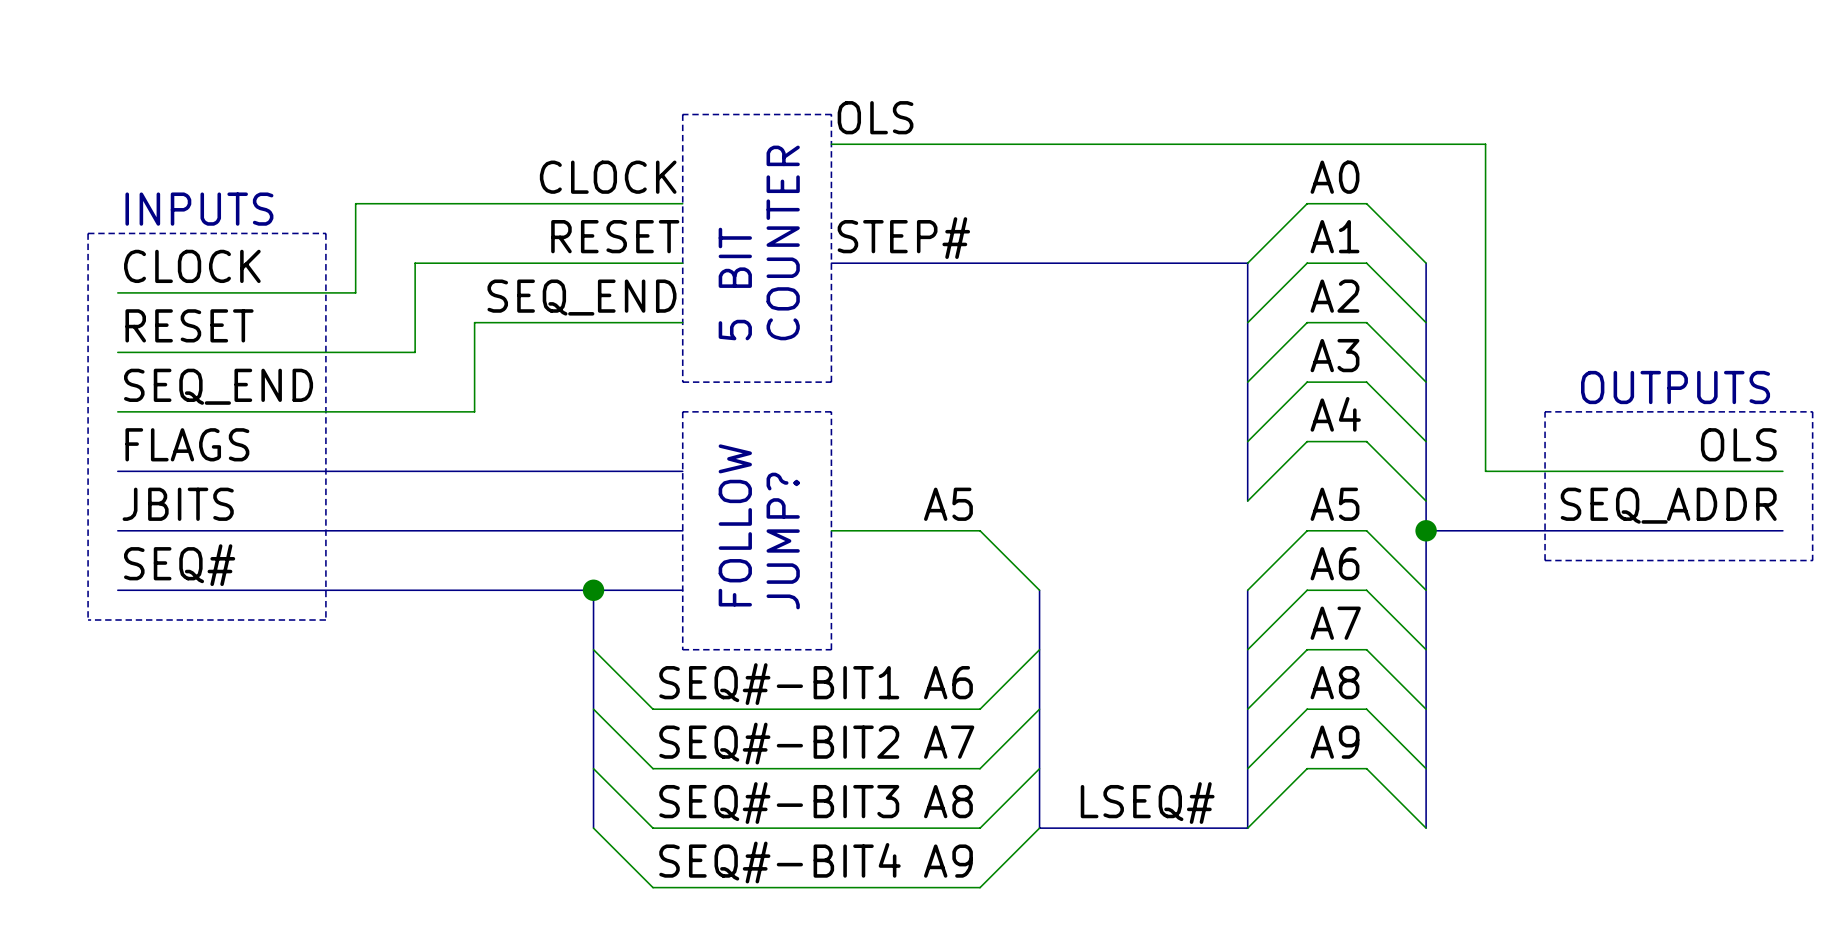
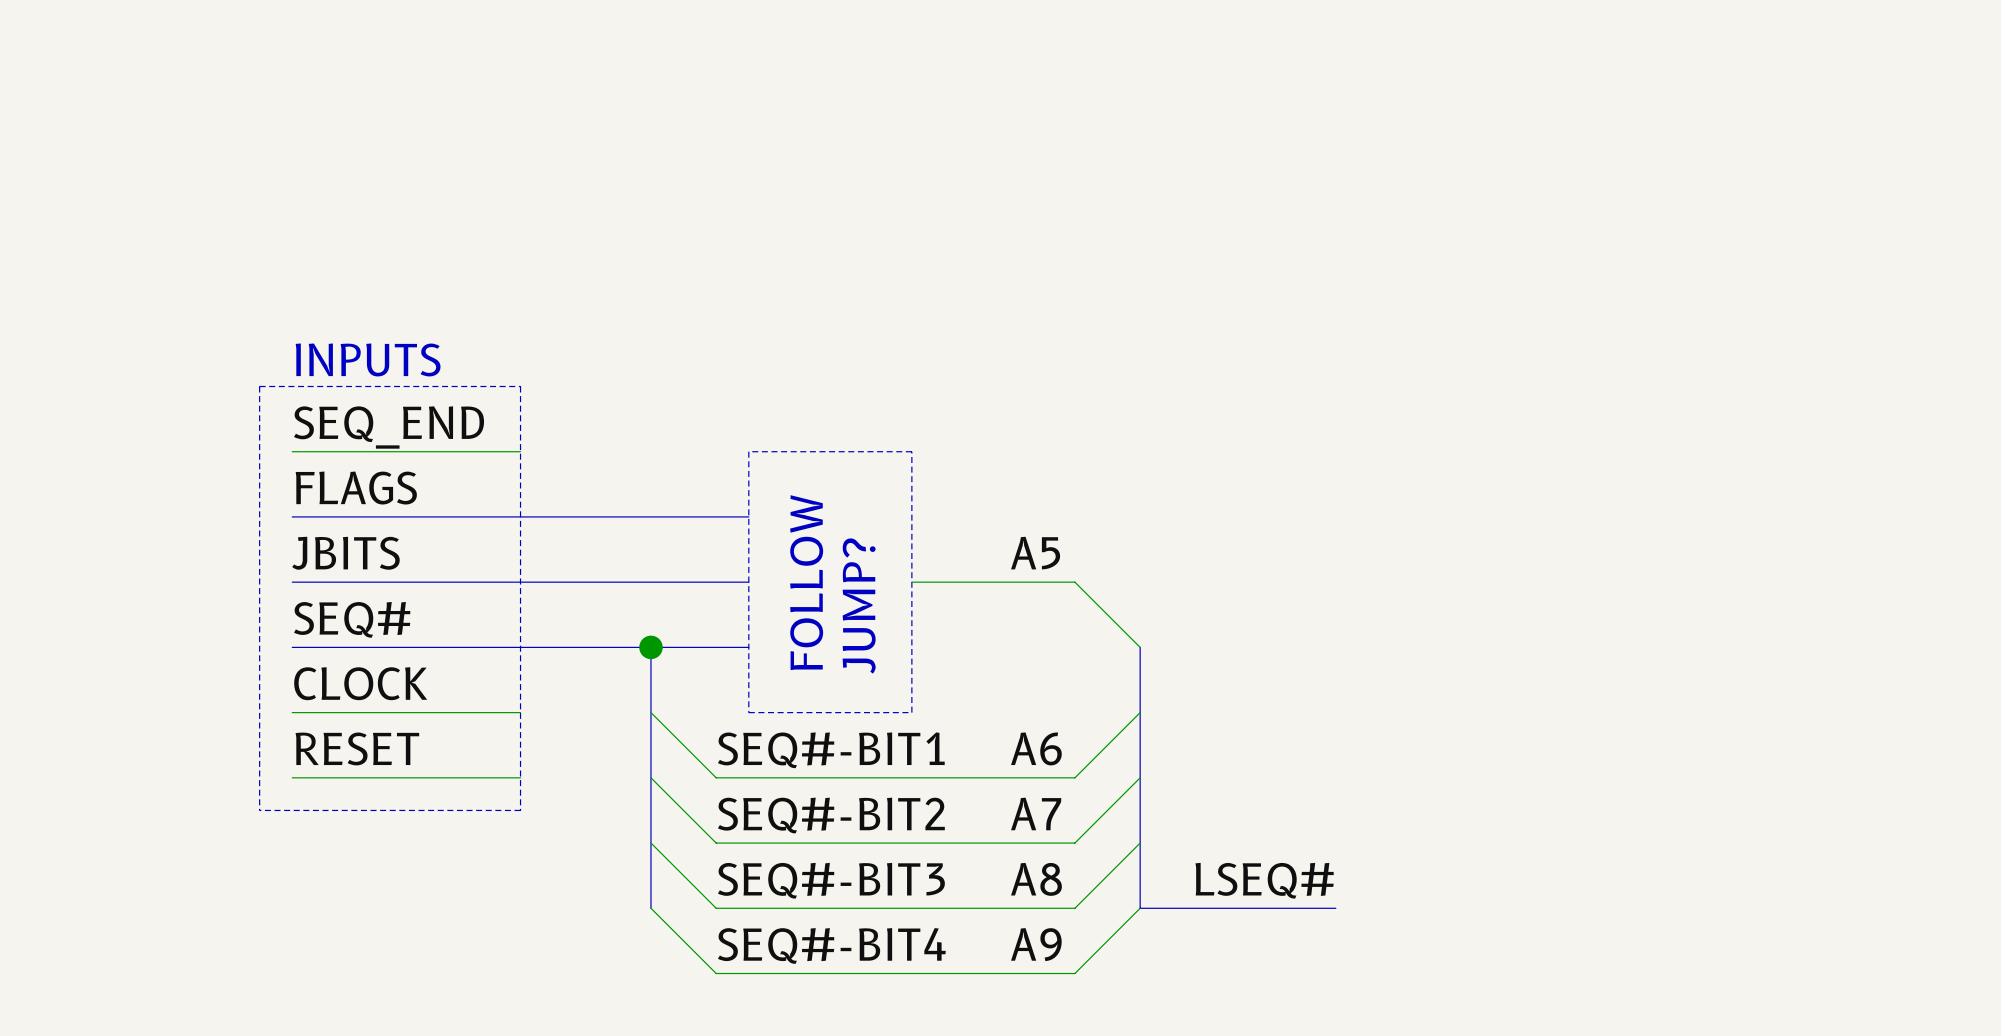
line: (682, 114) (682, 382) (831, 382) (831, 114) (682, 114) -> none
label: OLS (875, 117) -> none
wire: (831, 144) (1485, 144) (1485, 471) (1782, 471) -> none
label: CLOCK (608, 177) -> none
label: A0 (1334, 177) -> none
wire: (682, 203) (355, 203) (355, 292) (117, 292) -> none
text position: INPUTS (199, 209) -> INPUTS (368, 359)
line: (88, 233) (325, 233) (325, 620) (88, 620) (88, 233) -> (259, 386) (520, 386) (520, 810) (259, 810) (259, 386)
label: RESET (615, 236) -> none
label: A1 (1334, 236) -> none
label: STEP# (903, 238) -> none
text: COUNTER (783, 242) -> none
wire: (682, 263) (415, 263) (415, 352) (117, 352) -> none
bus: (831, 263) (1247, 263) (1247, 501) -> none
wire: (1247, 263) (1307, 203) (1366, 203) (1426, 263) -> none
bus: (1426, 263) (1426, 828) -> none
label: CLOCK (192, 266) -> none
text: 5 BIT (735, 284) -> none
label: A2 (1334, 296) -> none
label: SEQ_END (581, 297) -> none
wire: (682, 322) (474, 322) (474, 411) -> none
wire: (1247, 322) (1307, 263) (1366, 263) (1426, 322) -> none
label: RESET (189, 325) -> none
label: A3 (1334, 355) -> none
wire: (1247, 382) (1307, 322) (1366, 322) (1426, 382) -> none
label position: SEQ_END (218, 386) -> SEQ_END (389, 427)
text: OUTPUTS (1675, 387) -> none
wire: (117, 411) (266, 411) -> none
line: (1545, 411) (1545, 560) (1812, 560) (1812, 411) (1545, 411) -> none
label: A4 (1335, 414) -> none
wire: (1247, 441) (1307, 382) (1366, 382) (1426, 441) -> none
label position: FLAGS (187, 444) -> FLAGS (356, 488)
label: OLS (1738, 444) -> none
bus: (117, 471) (266, 471) -> none
wire: (1247, 501) (1307, 441) (1366, 441) (1426, 501) -> none
label position: JBITS (178, 504) -> JBITS (345, 553)
label: A5 (1334, 504) -> none
label: SEQ_ADDR (1668, 505) -> none
bus: (117, 530) (266, 530) -> none
bus: (1426, 530) (1782, 530) -> none
junction: (1426, 530) -> none
label: A6 (1334, 563) -> none
label position: SEQ# (179, 565) -> SEQ# (352, 619)
bus: (117, 590) (266, 590) -> none
wire: (1247, 590) (1307, 530) (1366, 530) (1426, 590) -> none
bus: (1247, 590) (1247, 828) (1217, 828) -> none
label: none -> CLOCK (360, 683)
label: A7 (1335, 623) -> none
wire: none -> (292, 712) (520, 712)
wire: (1247, 649) (1307, 590) (1366, 590) (1426, 649) -> none
label: none -> RESET (357, 748)
label: A8 (1334, 682) -> none
wire: none -> (292, 777) (520, 777)
wire: (1247, 709) (1307, 649) (1366, 649) (1426, 709) -> none
label: A9 (1334, 742) -> none
wire: (1247, 768) (1307, 709) (1366, 709) (1426, 768) -> none
wire: (1247, 828) (1307, 768) (1366, 768) (1426, 828) -> none

